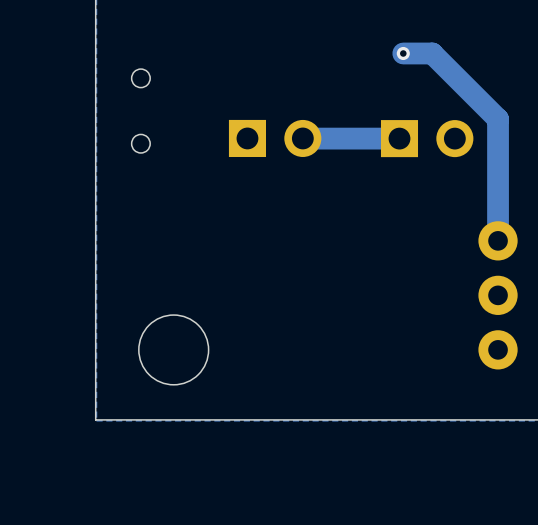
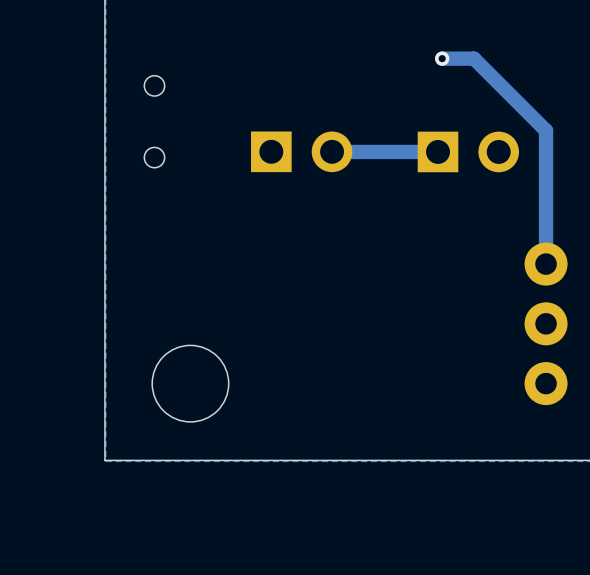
track width: thick (403, 53) (432, 53) (498, 119) (498, 240) -> thin (442, 58) (474, 58) (546, 130) (546, 264)
track width: thick (399, 138) (302, 138) -> thin (438, 151) (332, 151)

